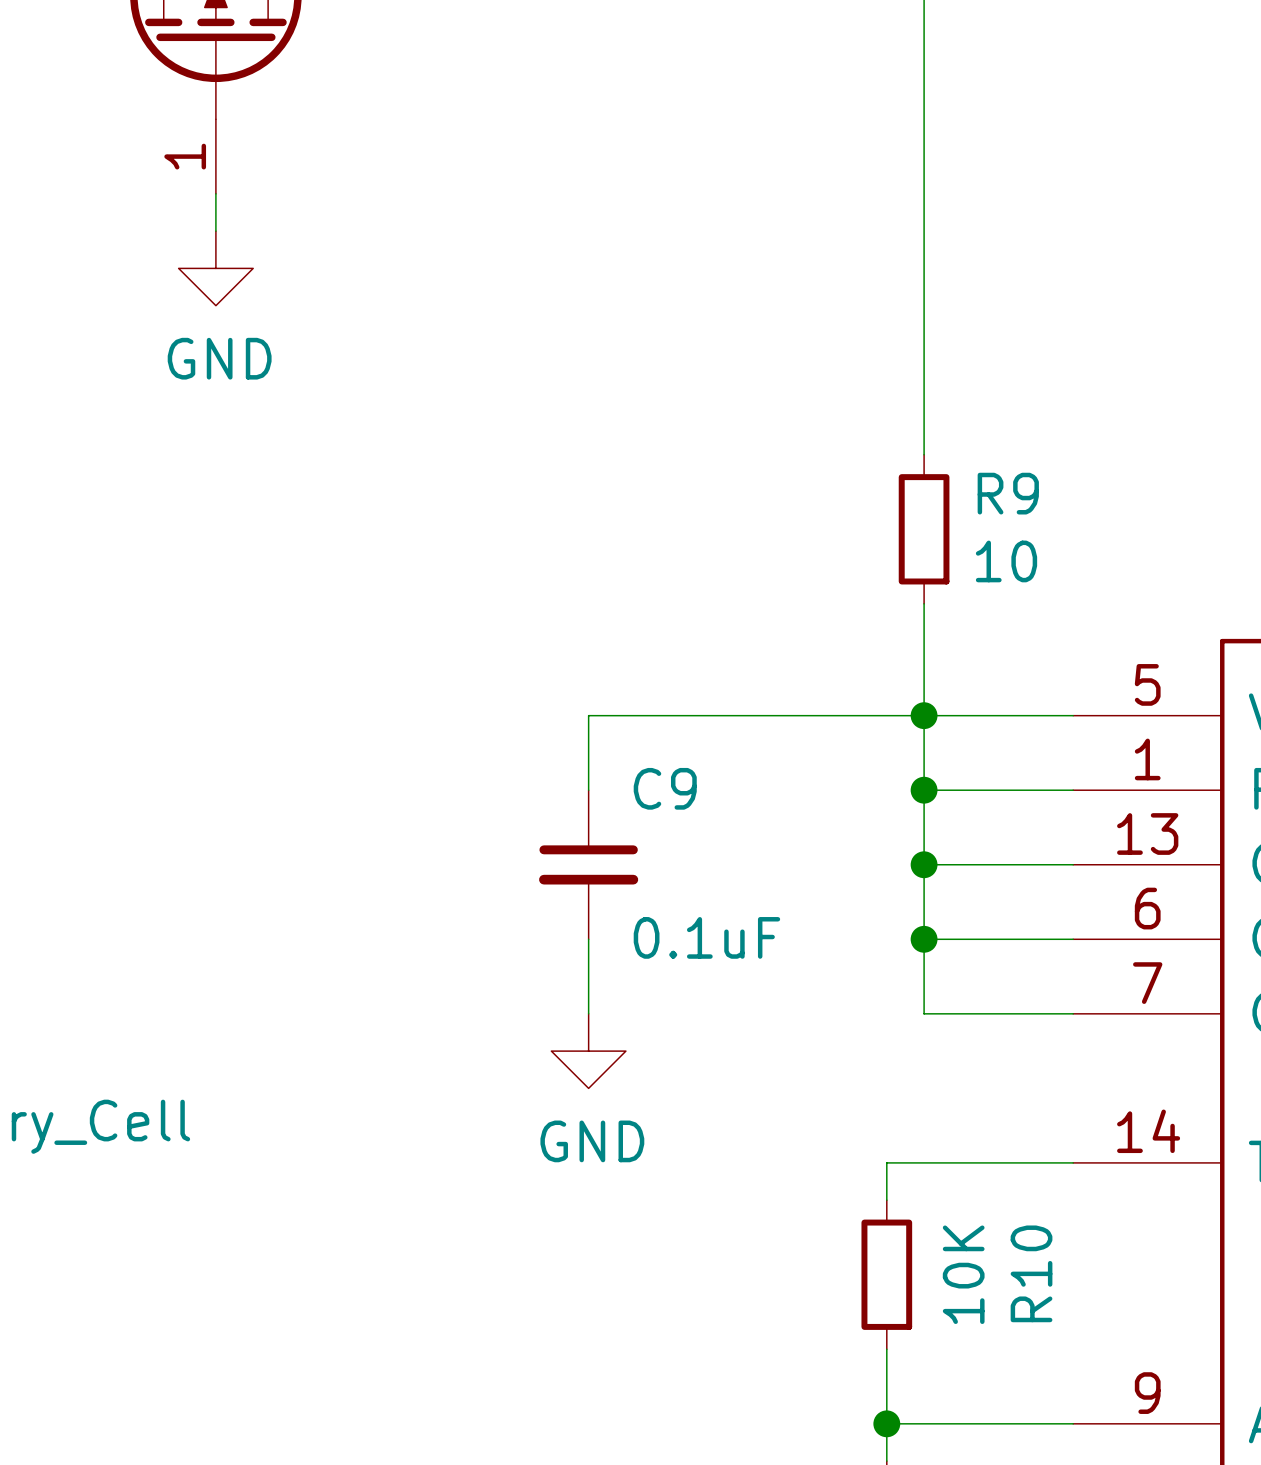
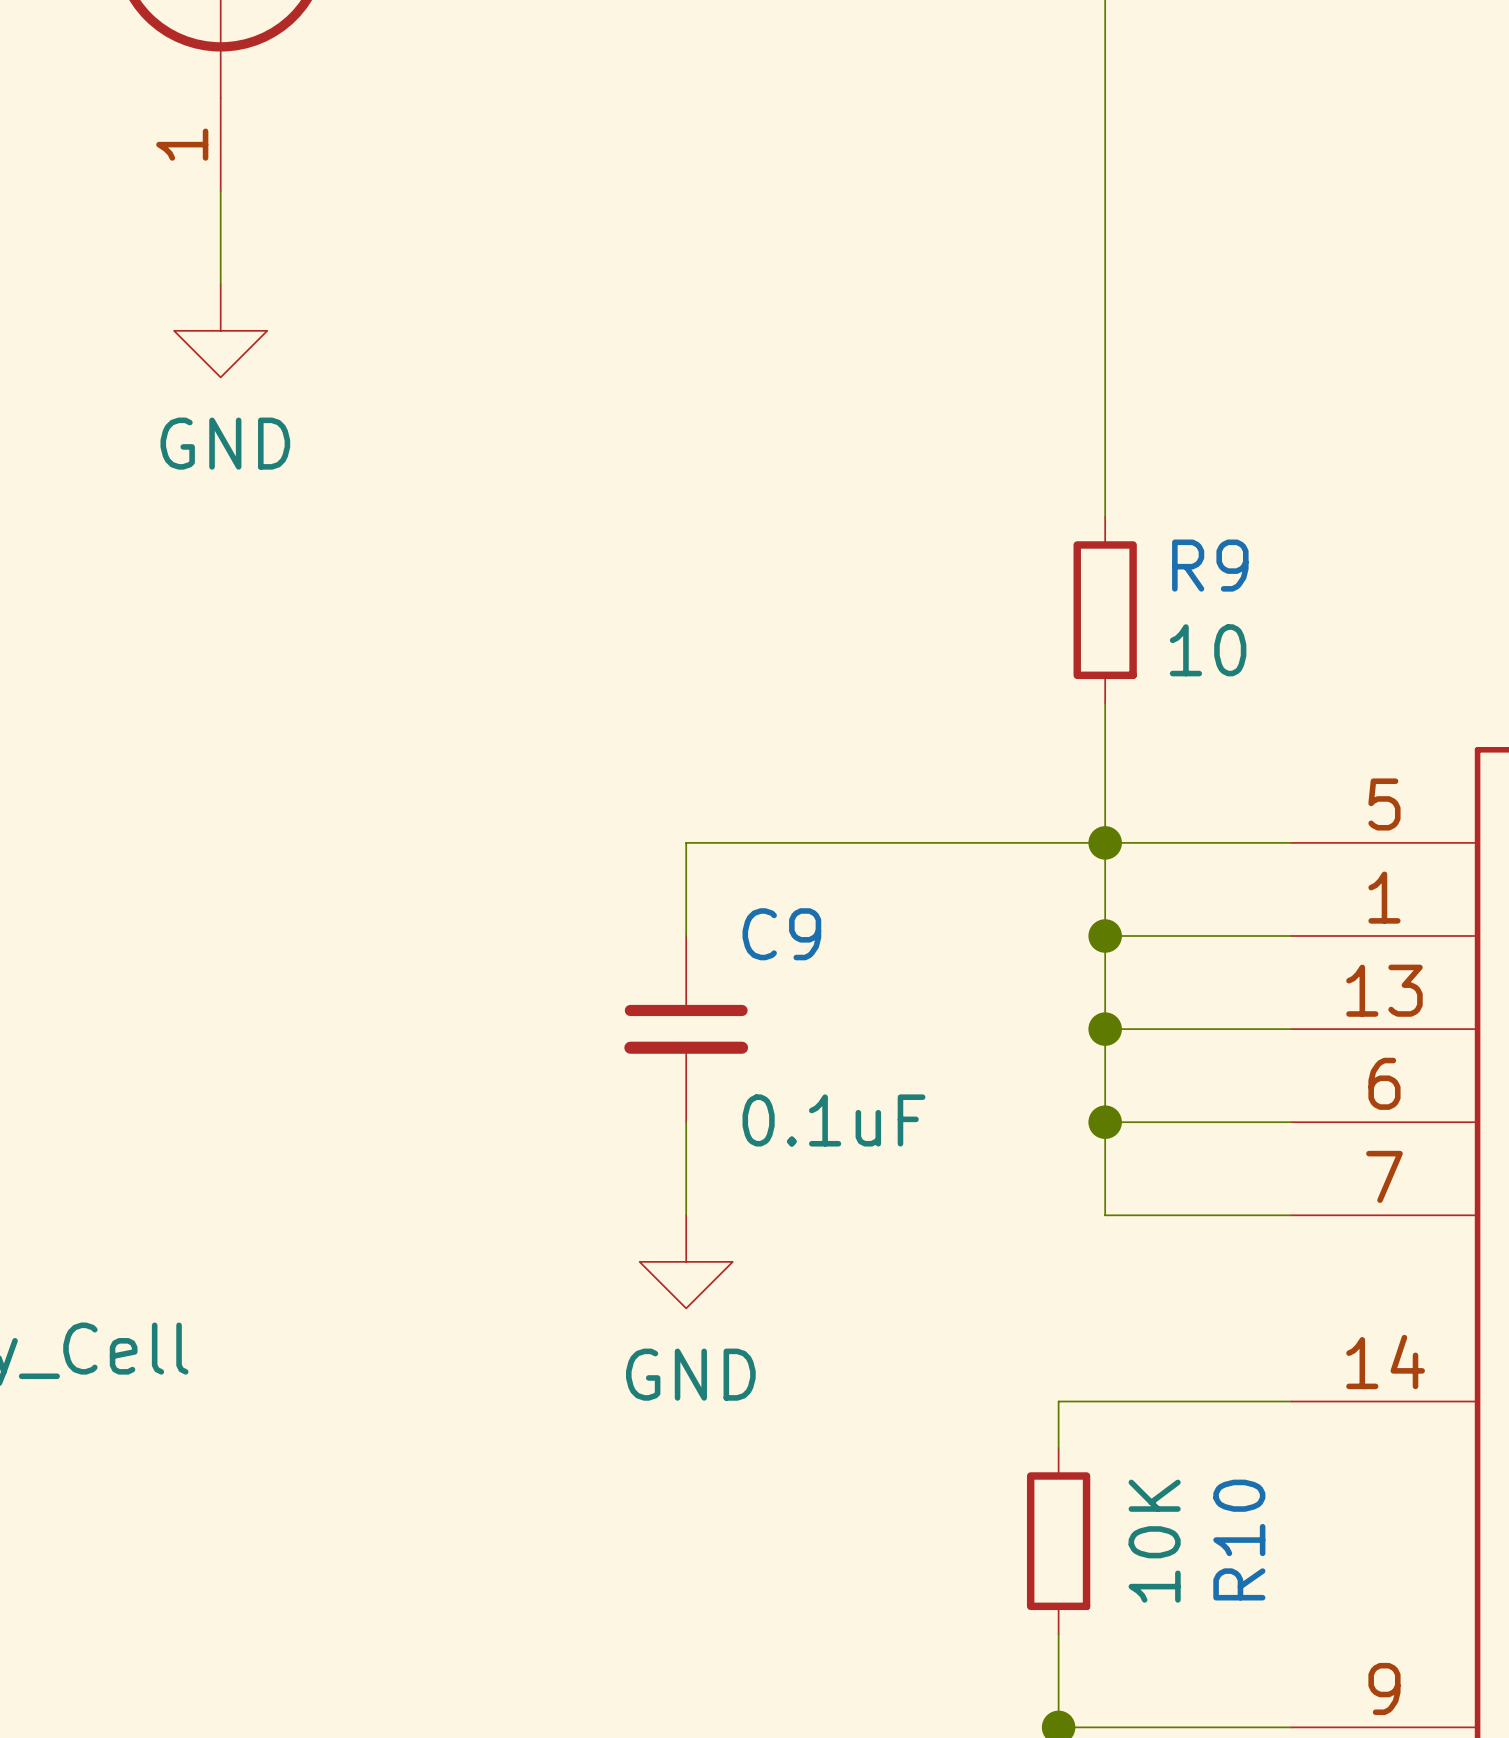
power symbol position: GND (215, 268) -> GND (220, 330)

